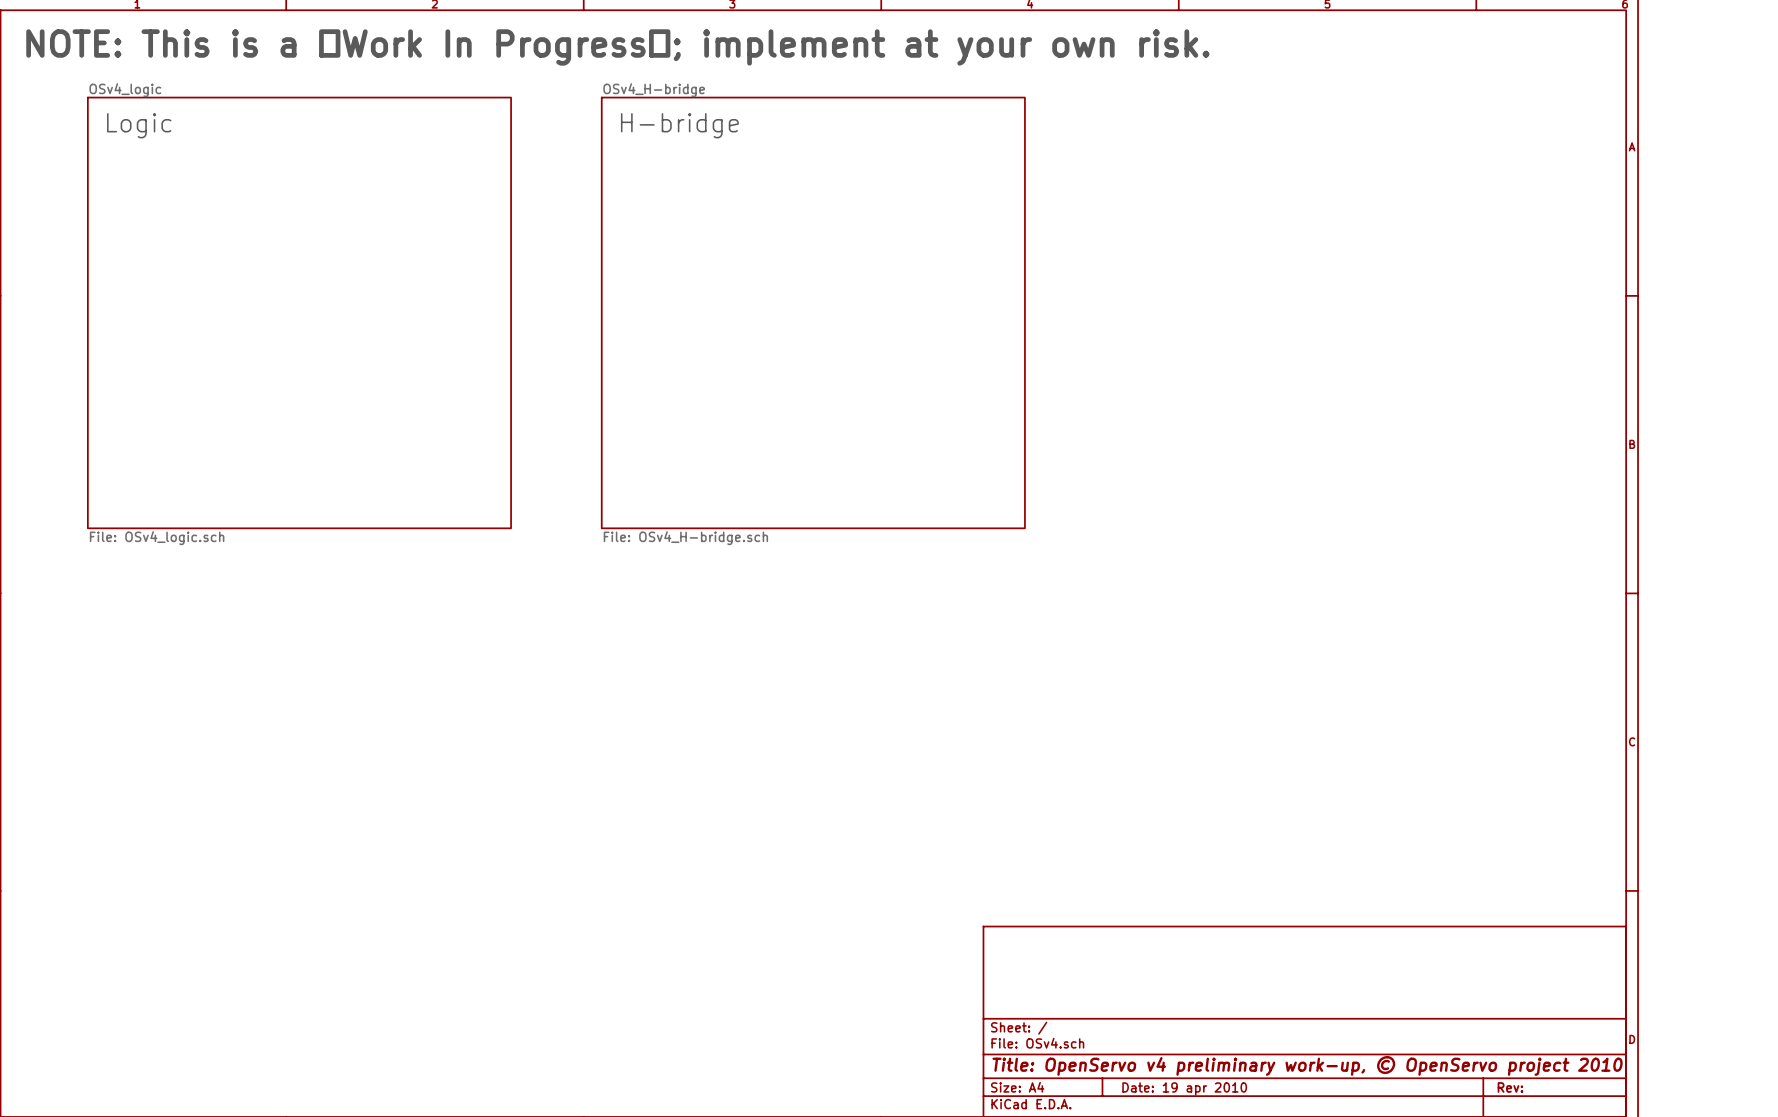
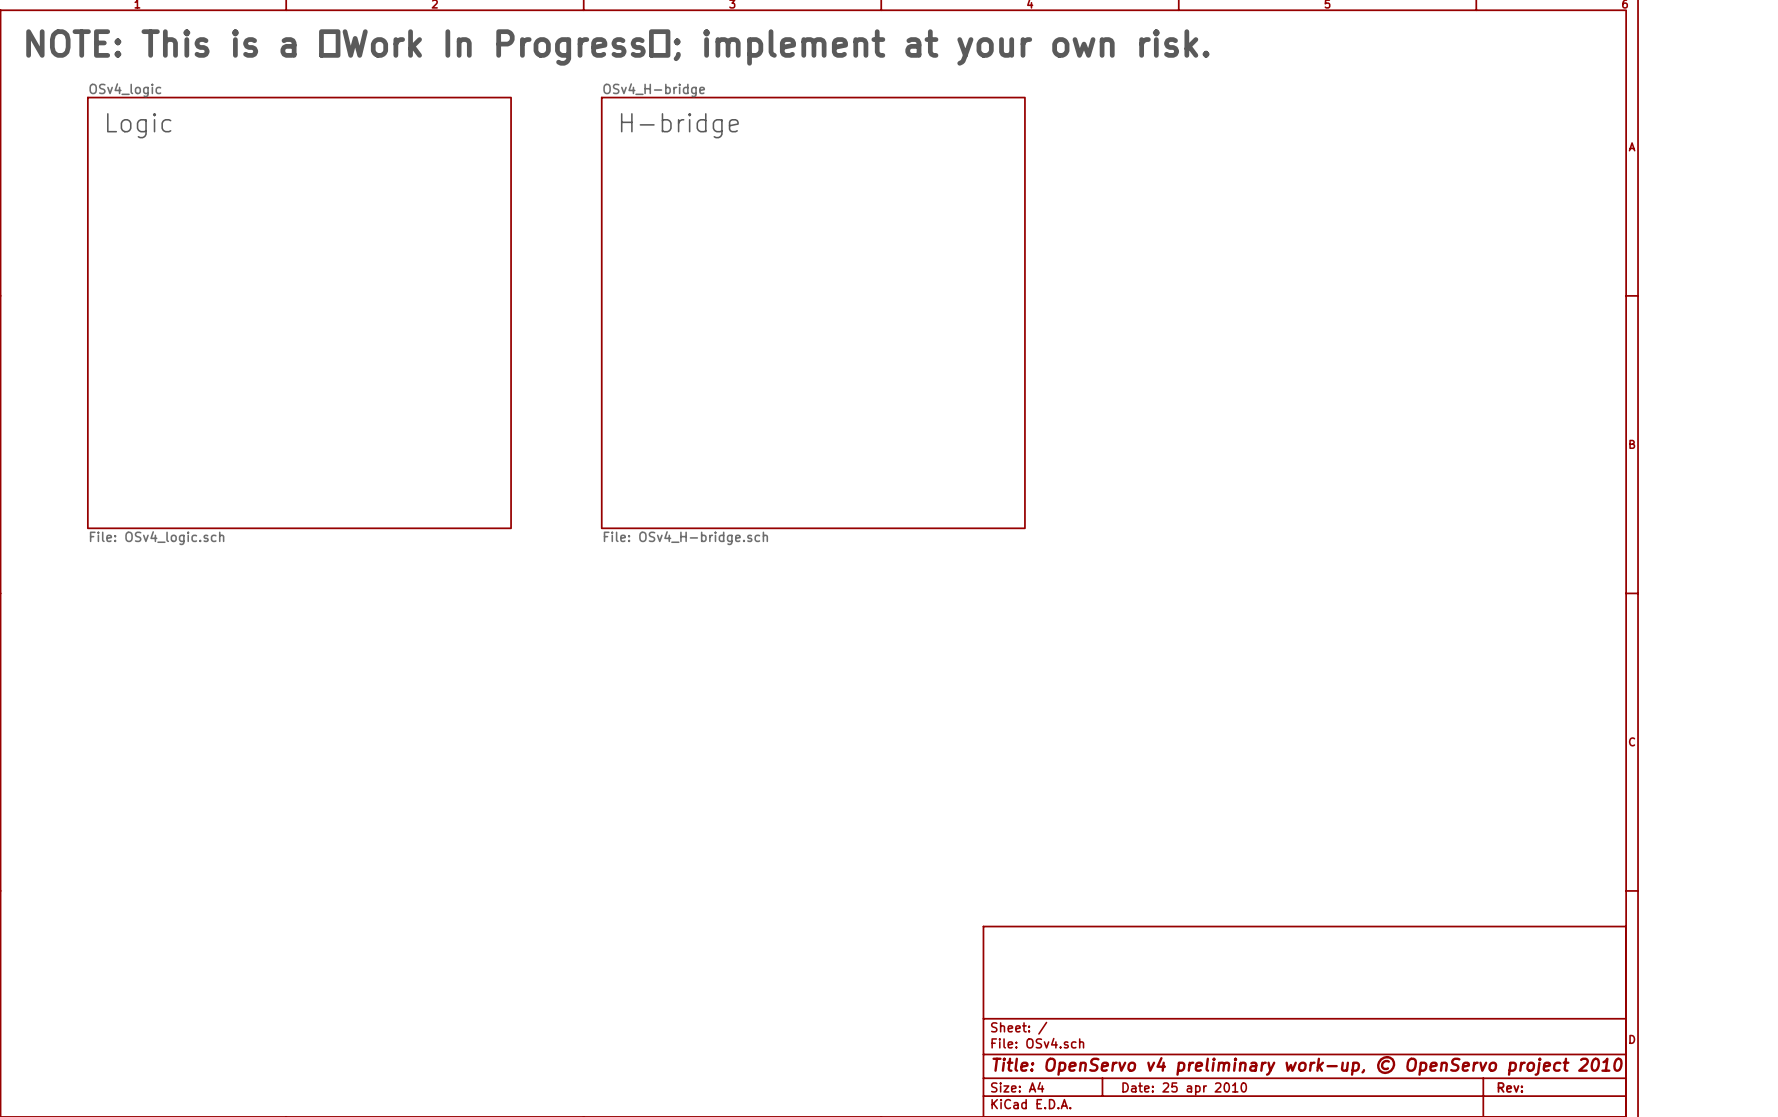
title block: Date: 19 apr 2010 (1184, 1088) -> Date: 25 apr 2010 (1184, 1088)

